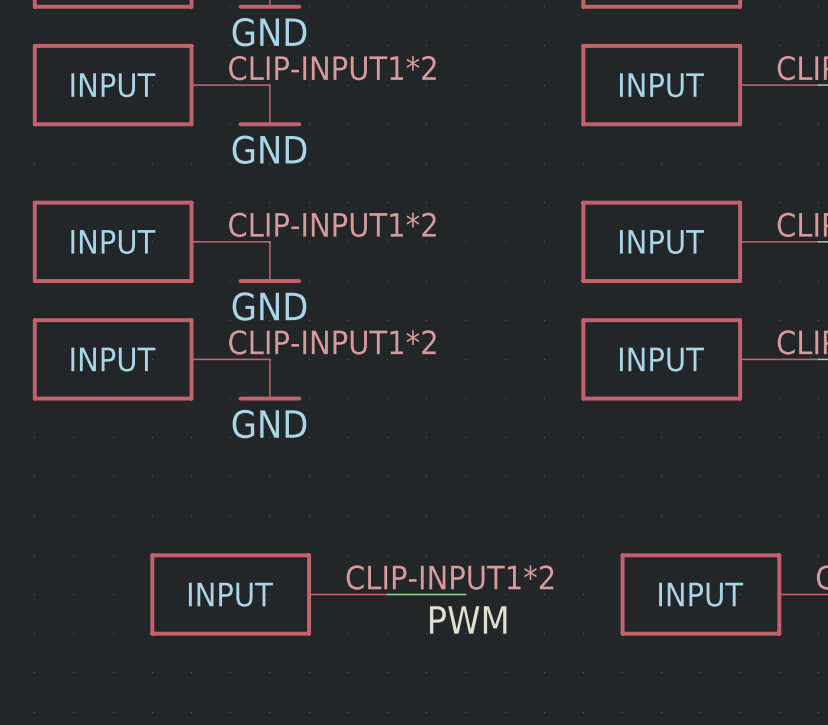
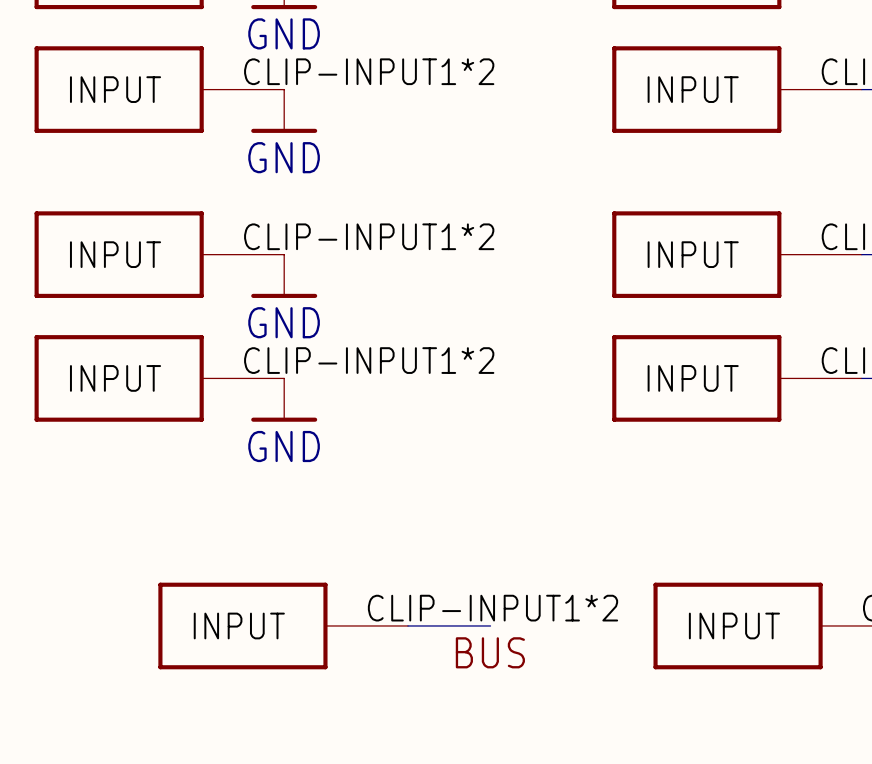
label: PWM (468, 619) -> BUS (490, 652)

